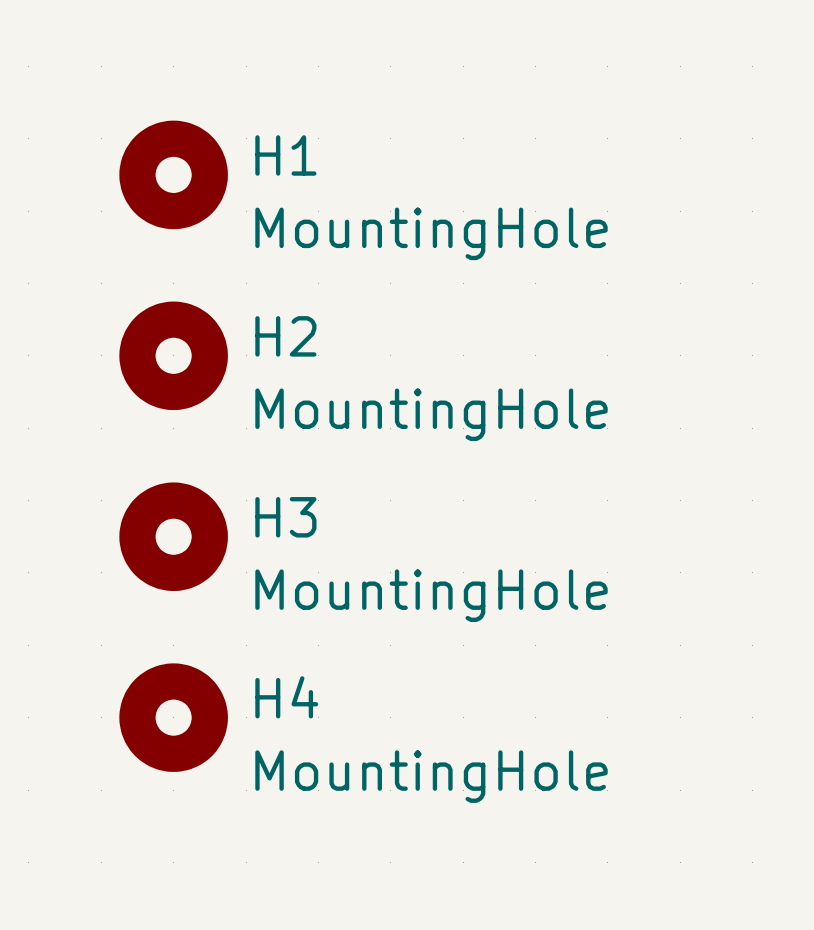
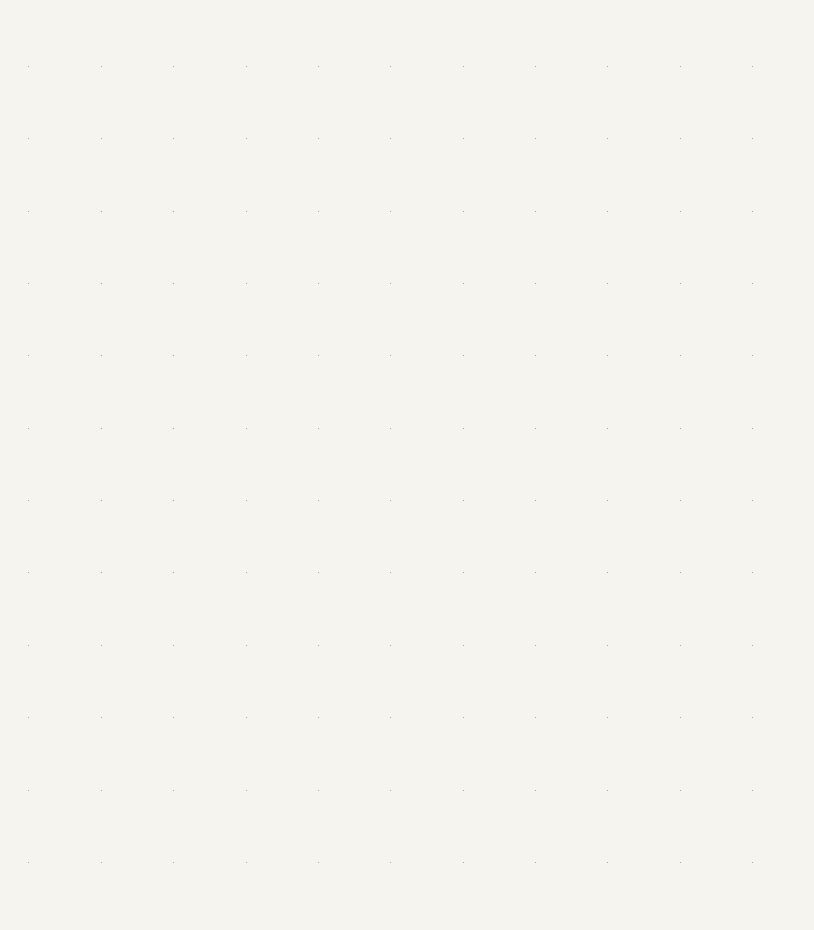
H1: MountingHole (173, 174) -> none
H2: MountingHole (173, 355) -> none
H3: MountingHole (173, 536) -> none
H4: MountingHole (173, 717) -> none

